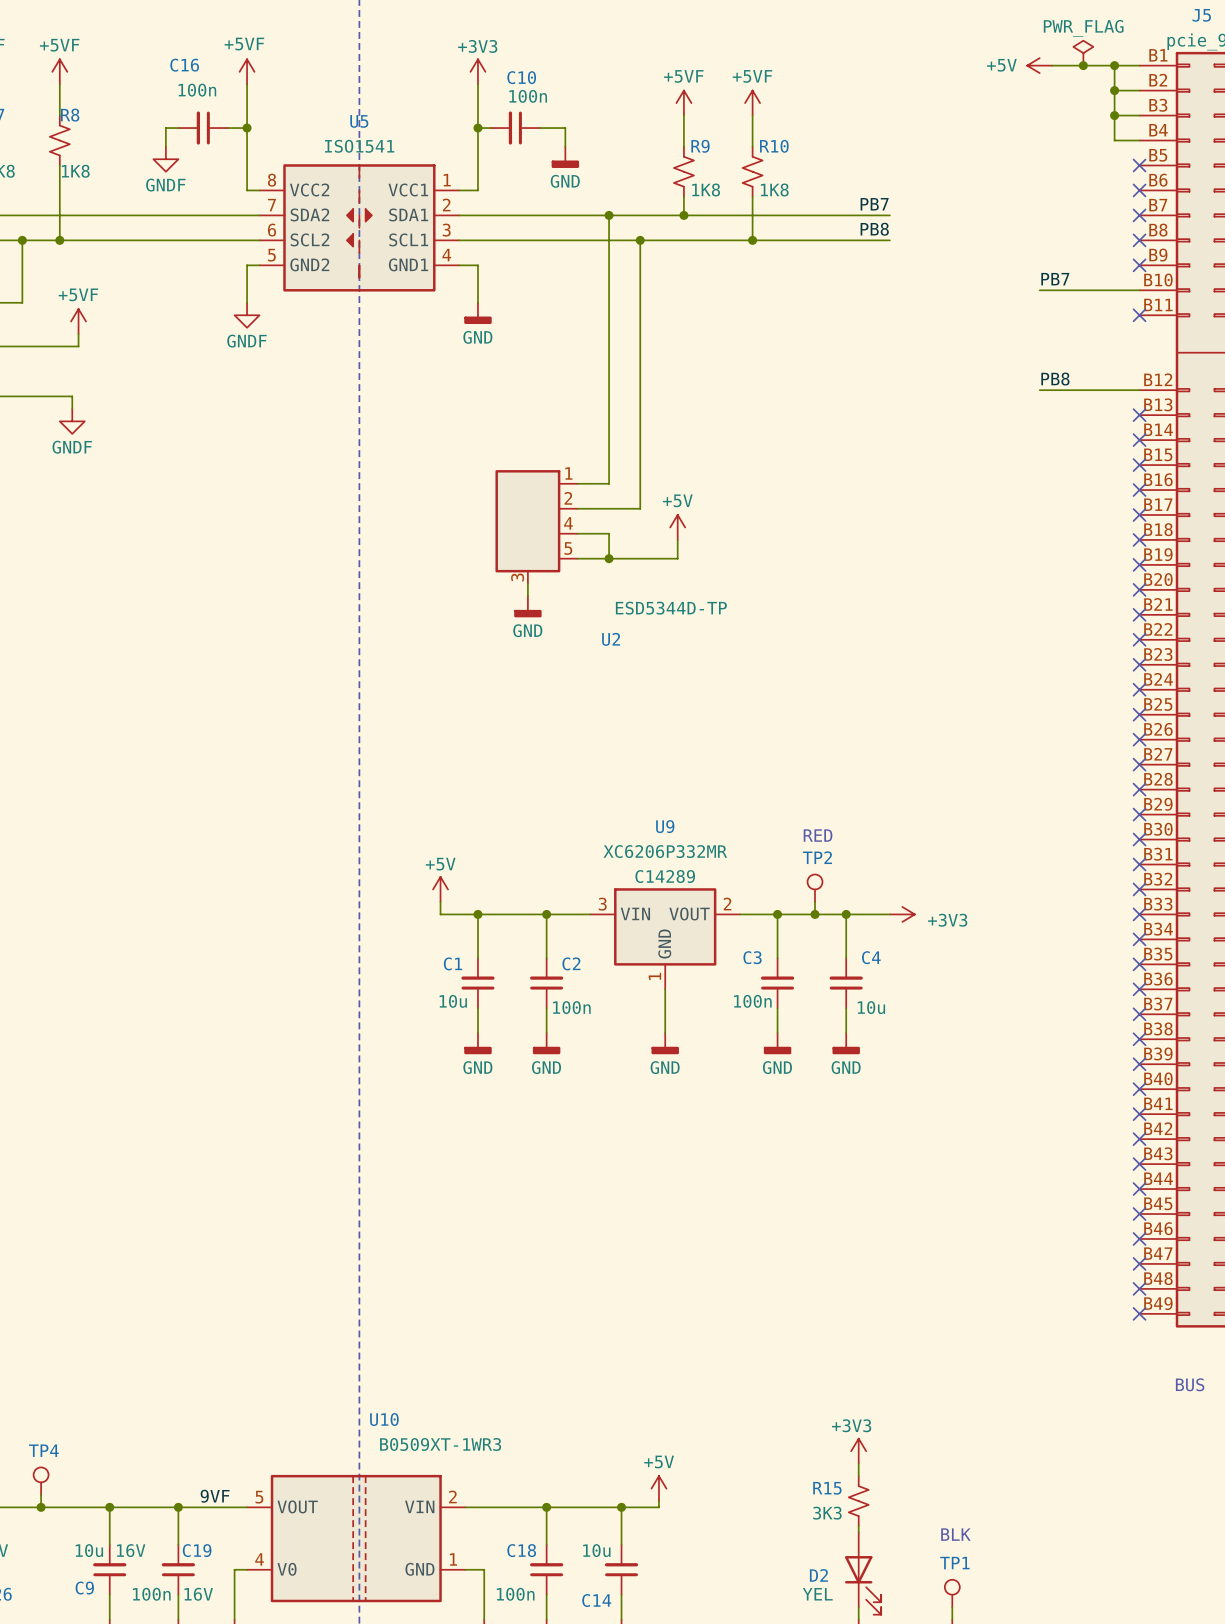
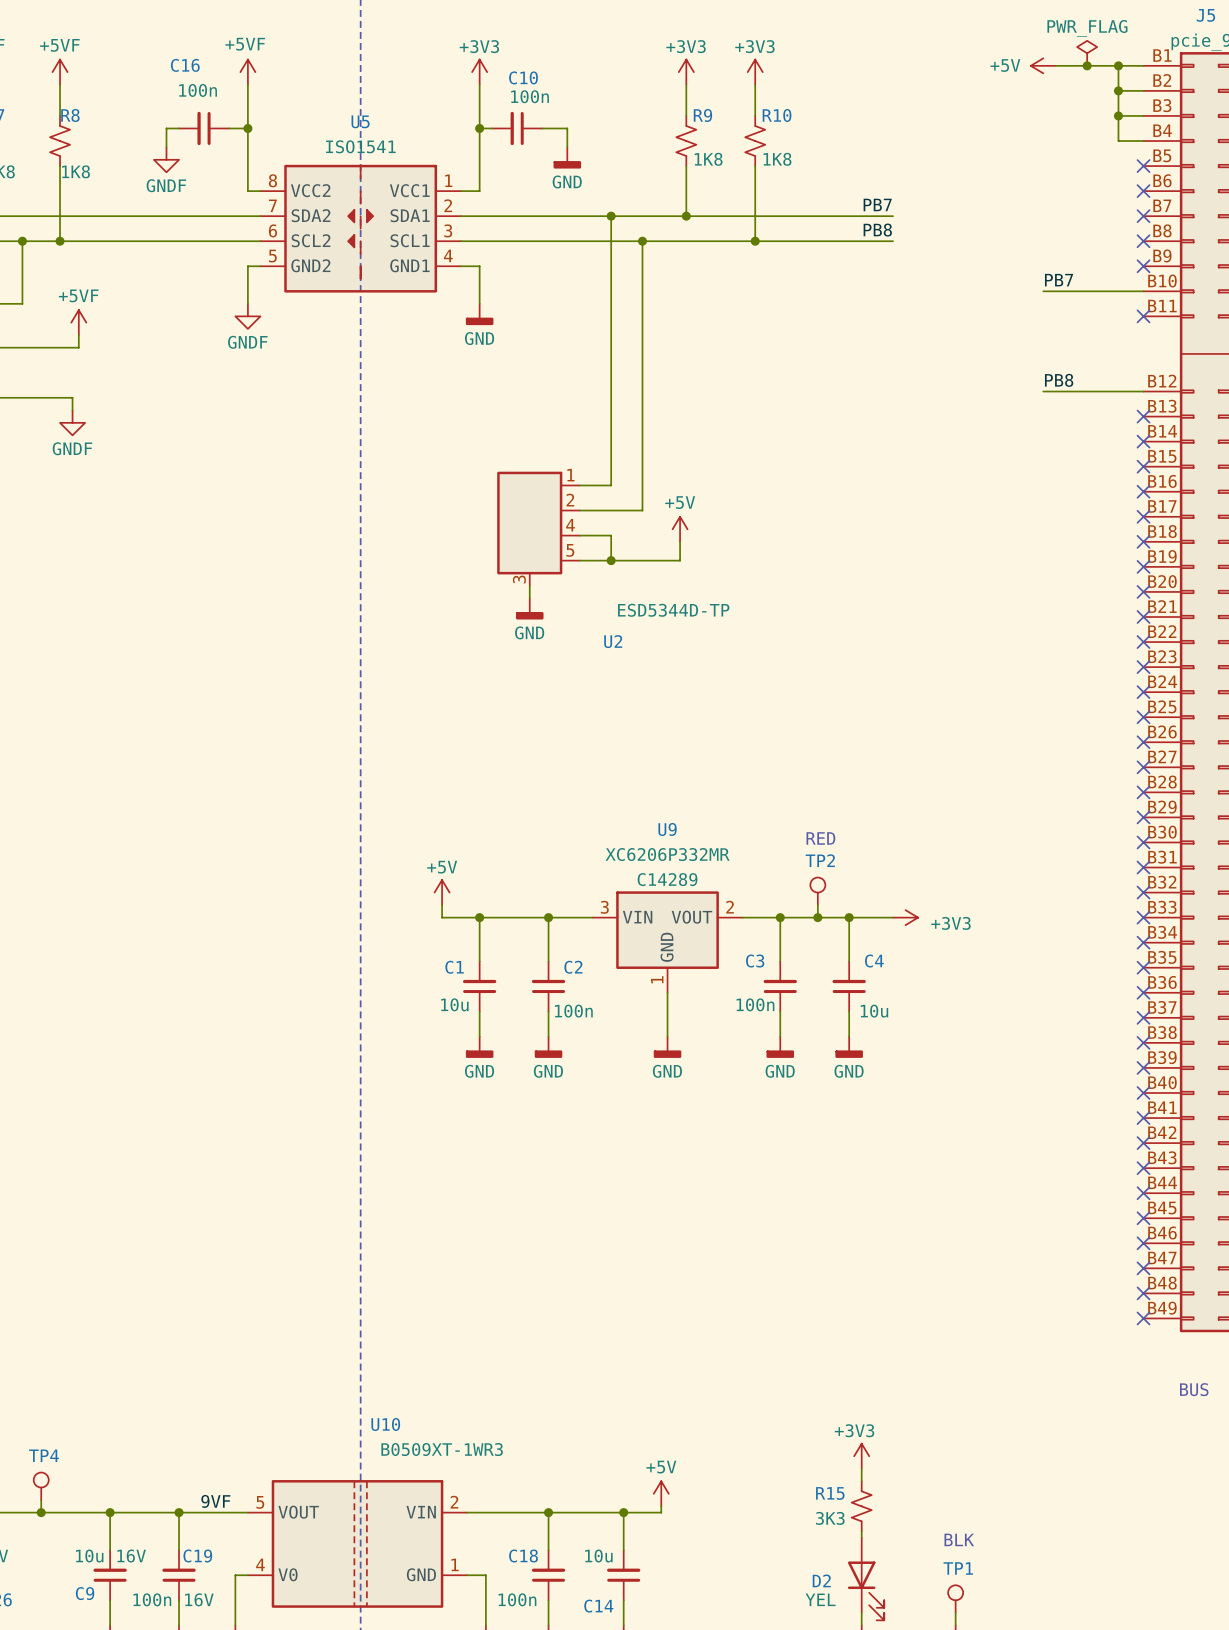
power symbol: none -> +3V3 (686, 72)
power symbol: none -> +3V3 (755, 72)
power symbol: +5VF (683, 103) -> none
power symbol: +5VF (752, 103) -> none
wire: none -> (686, 166) (686, 197)
wire: none -> (755, 166) (755, 197)
R9 position: (683, 171) -> (686, 141)
R10 position: (752, 171) -> (755, 141)

